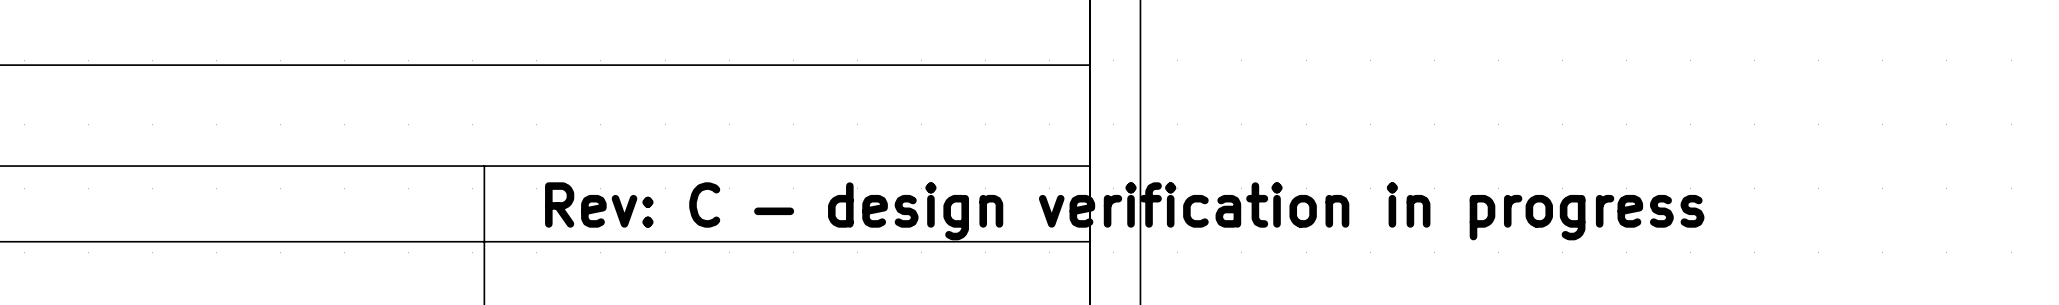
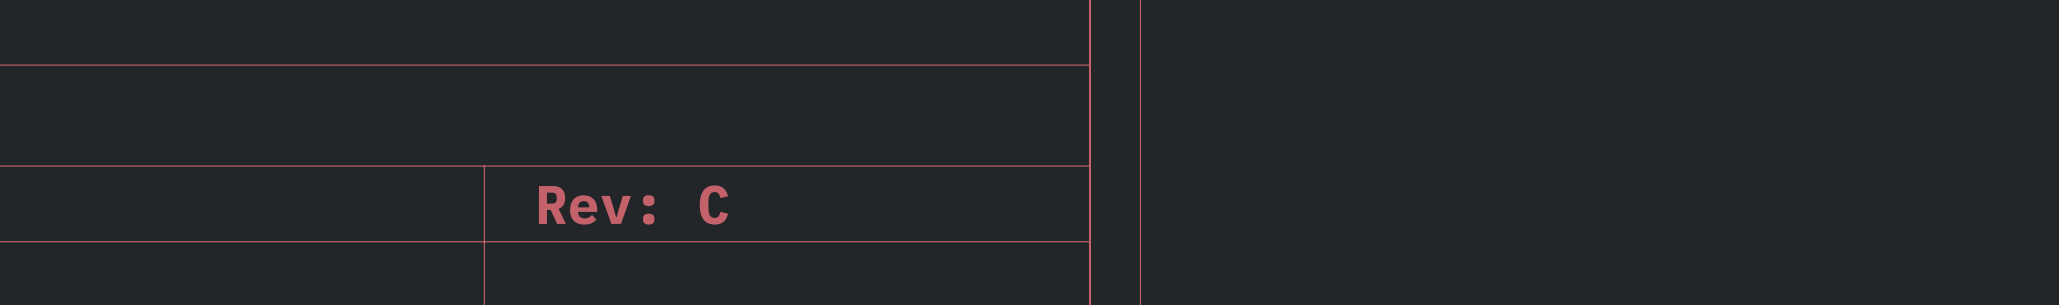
title block: Rev: C — design verification in progress (1124, 211) -> Rev: C (633, 205)

